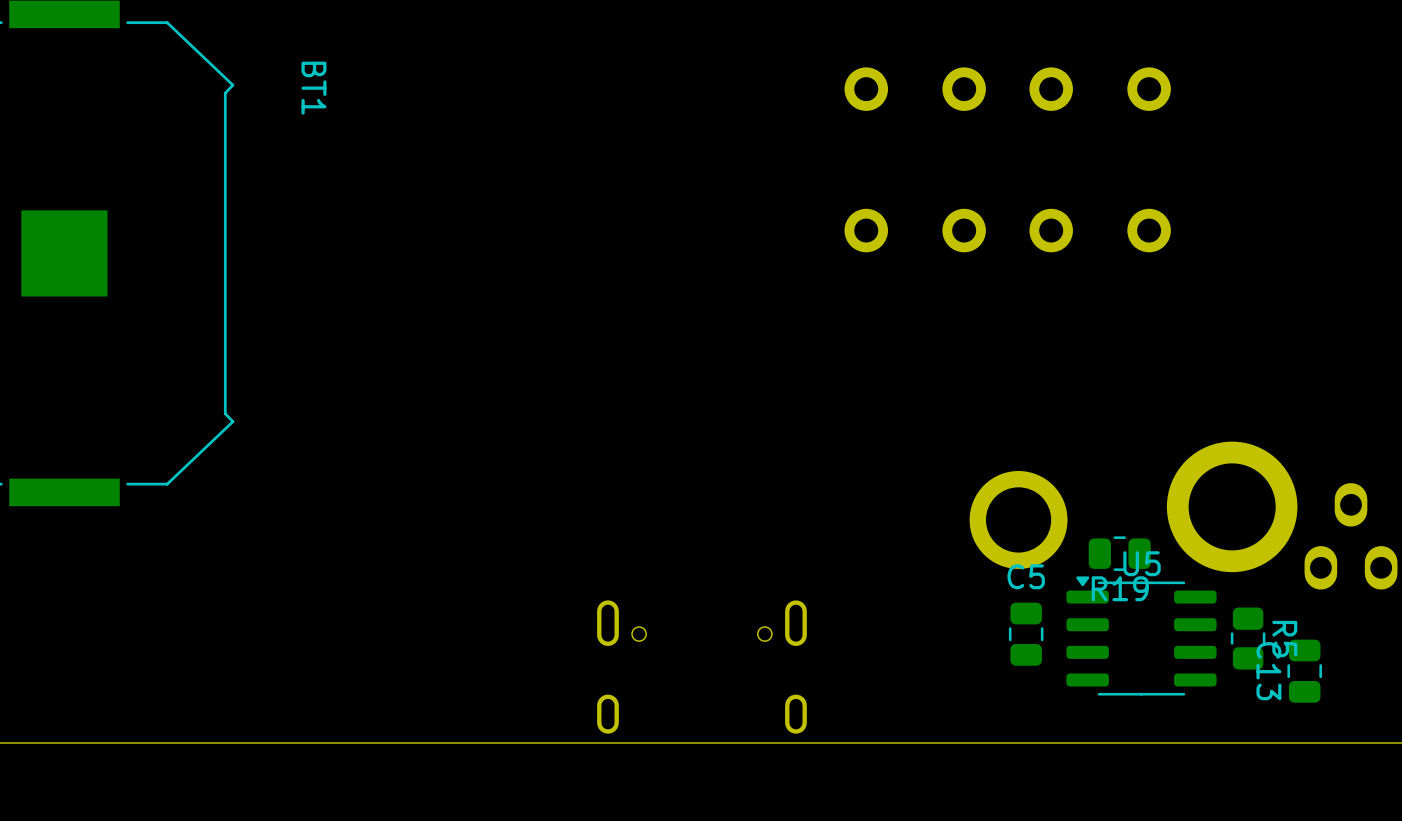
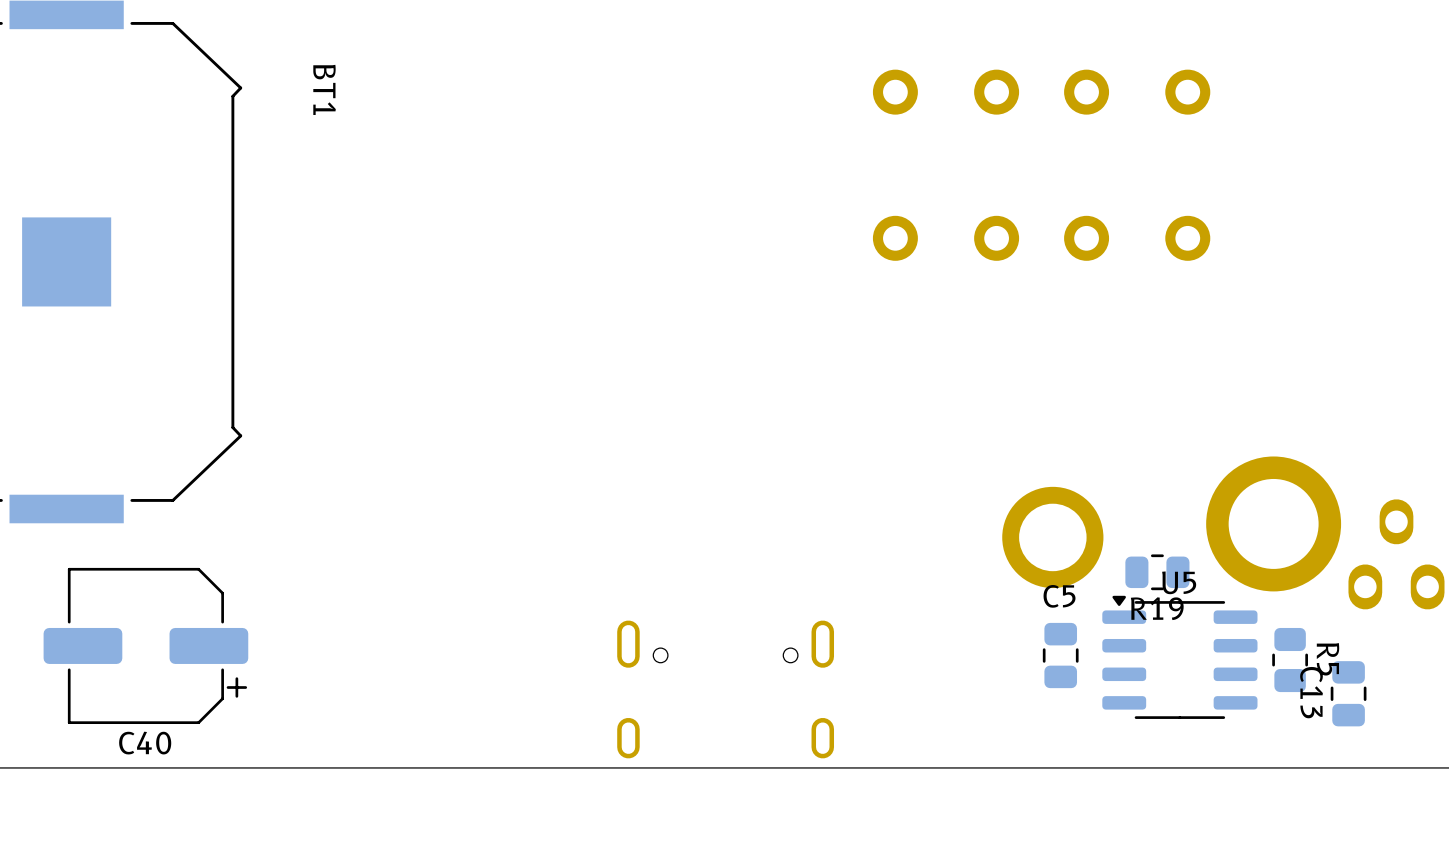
C40: none -> (145, 645)

